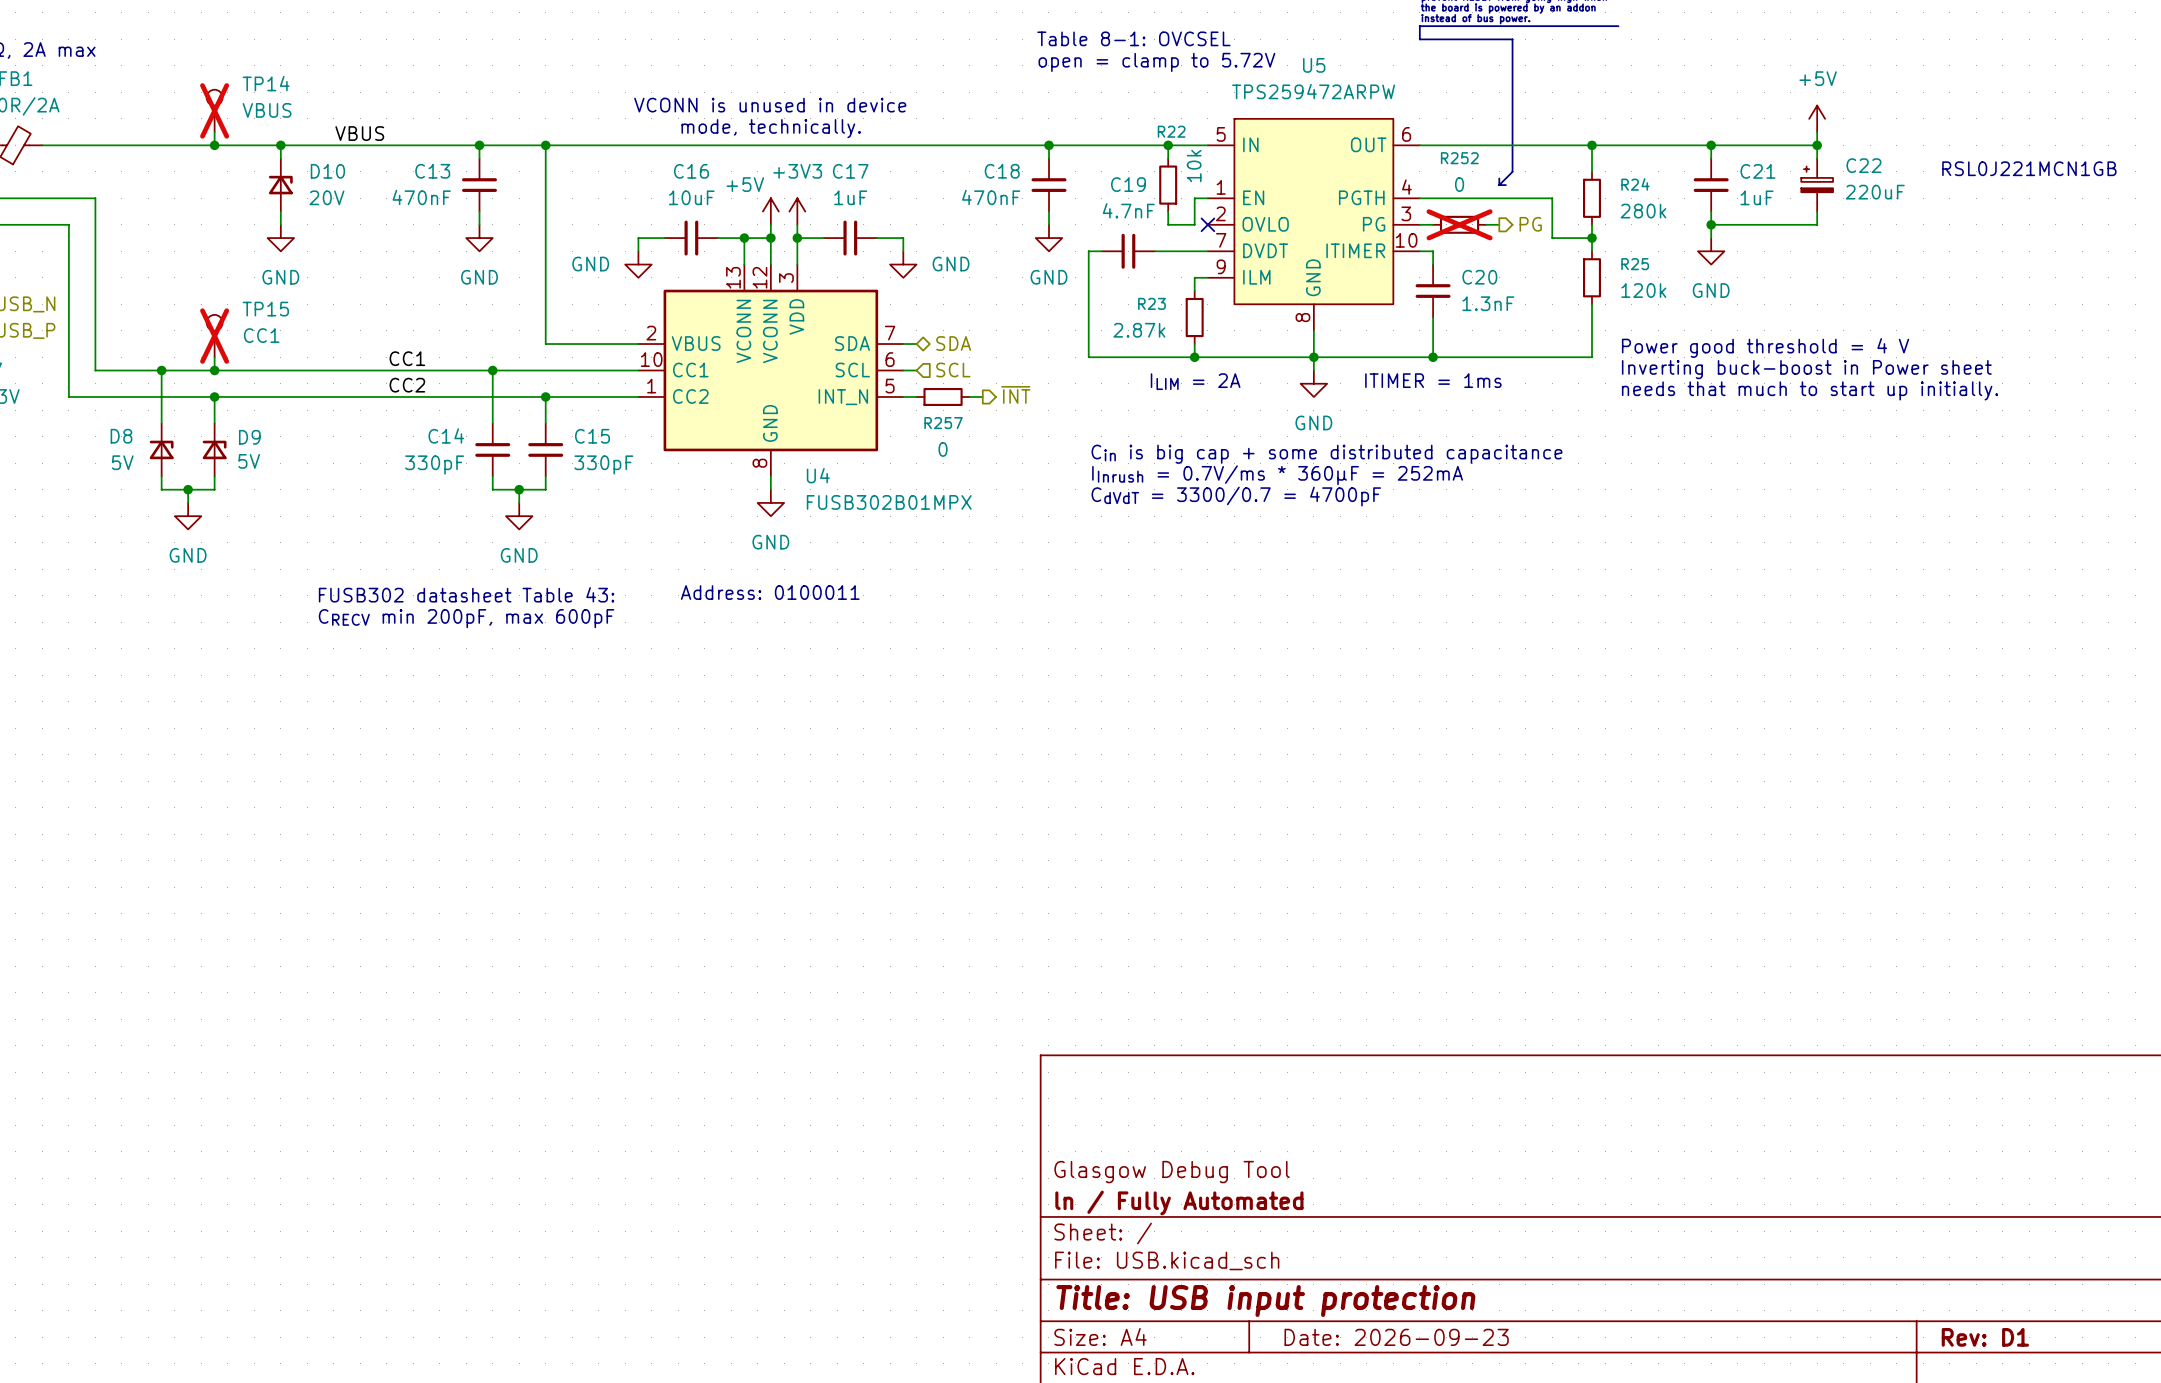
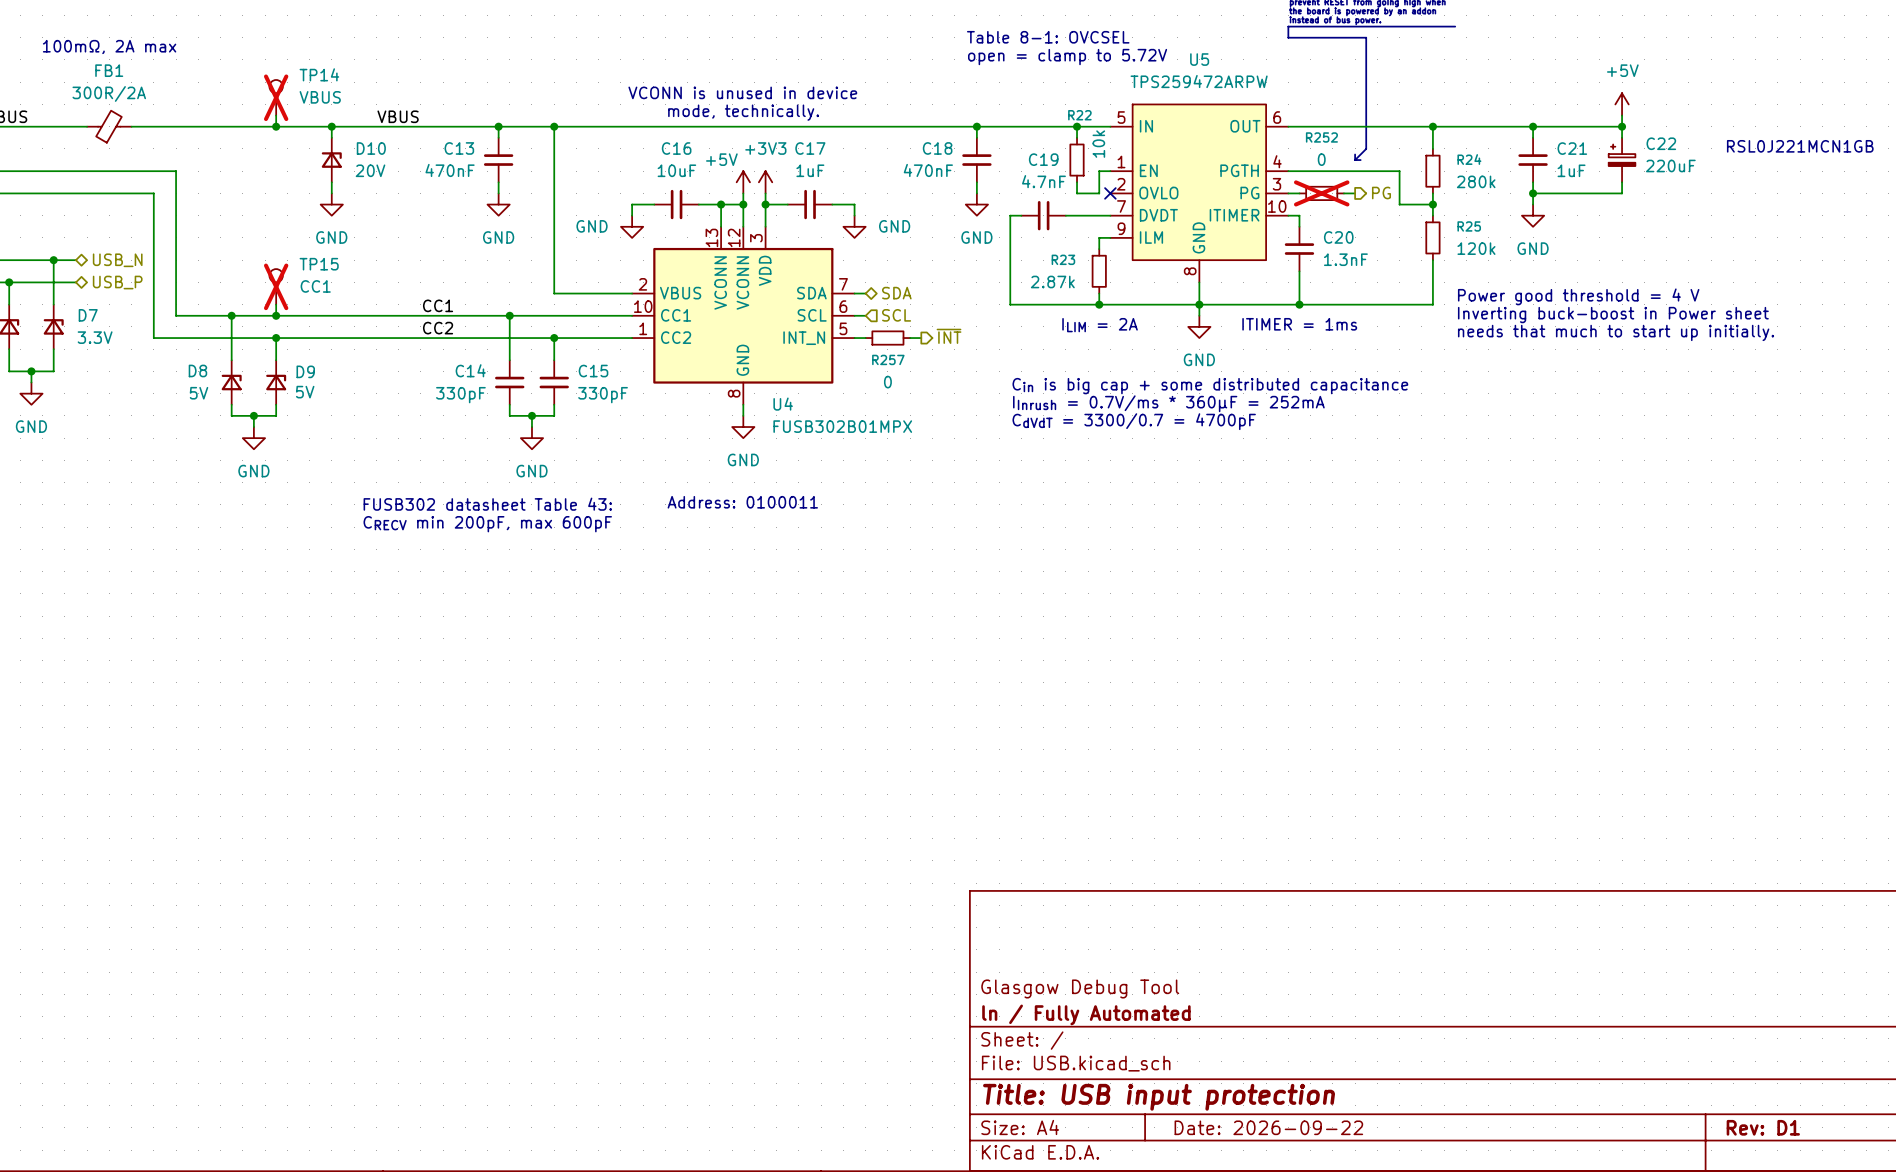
title block: Date: 2026-09-23 (1396, 1337) -> Date: 2026-09-22 (1268, 1127)

